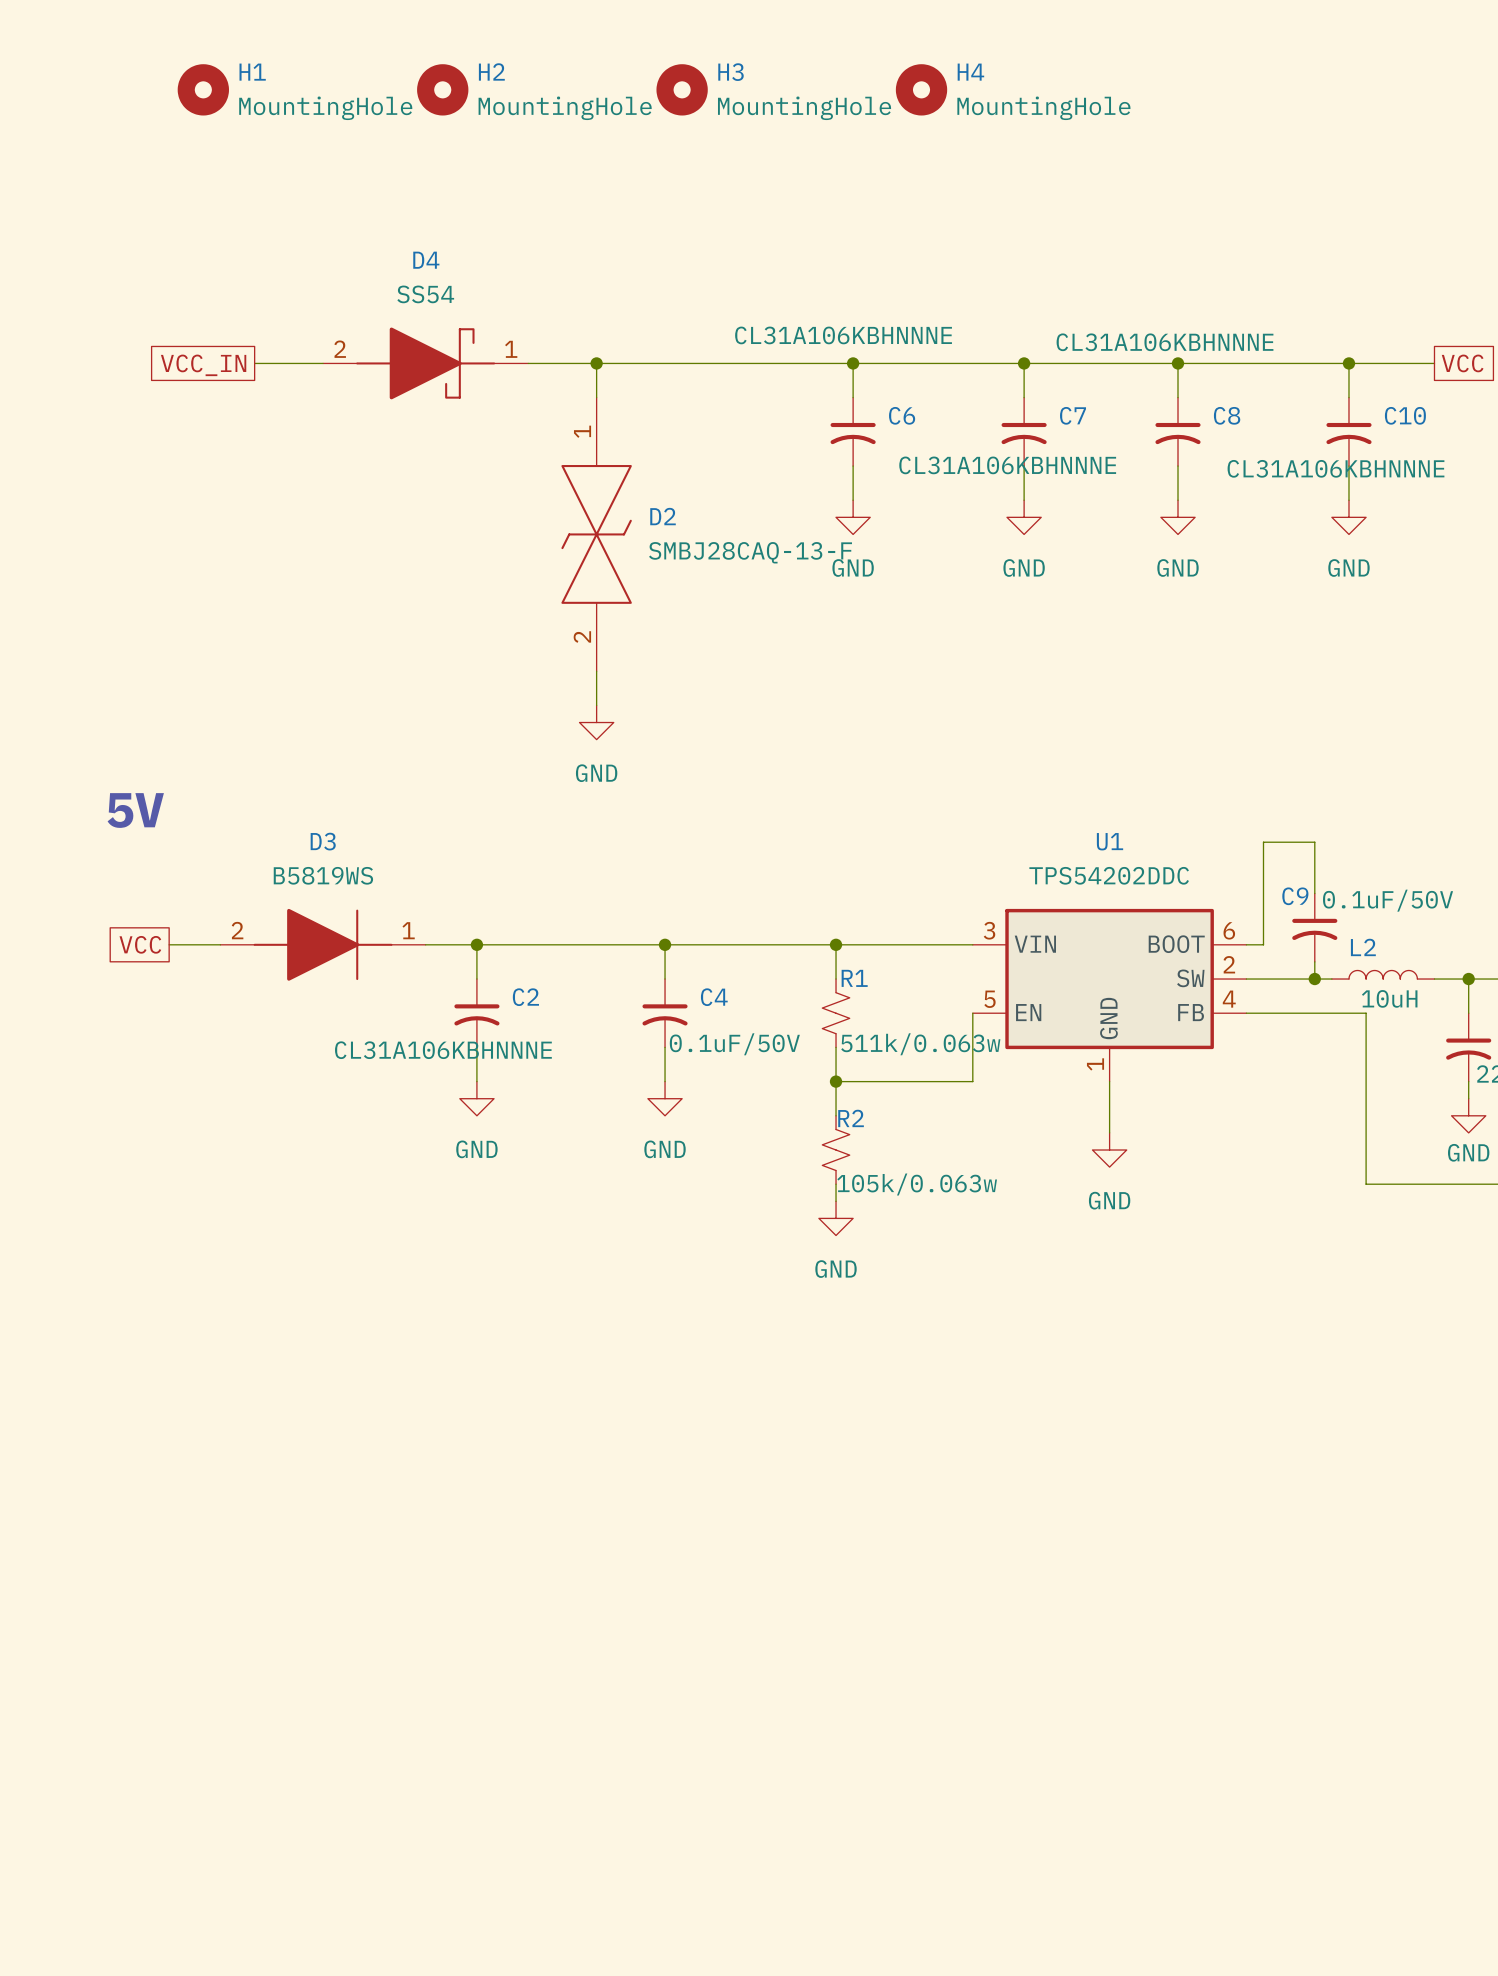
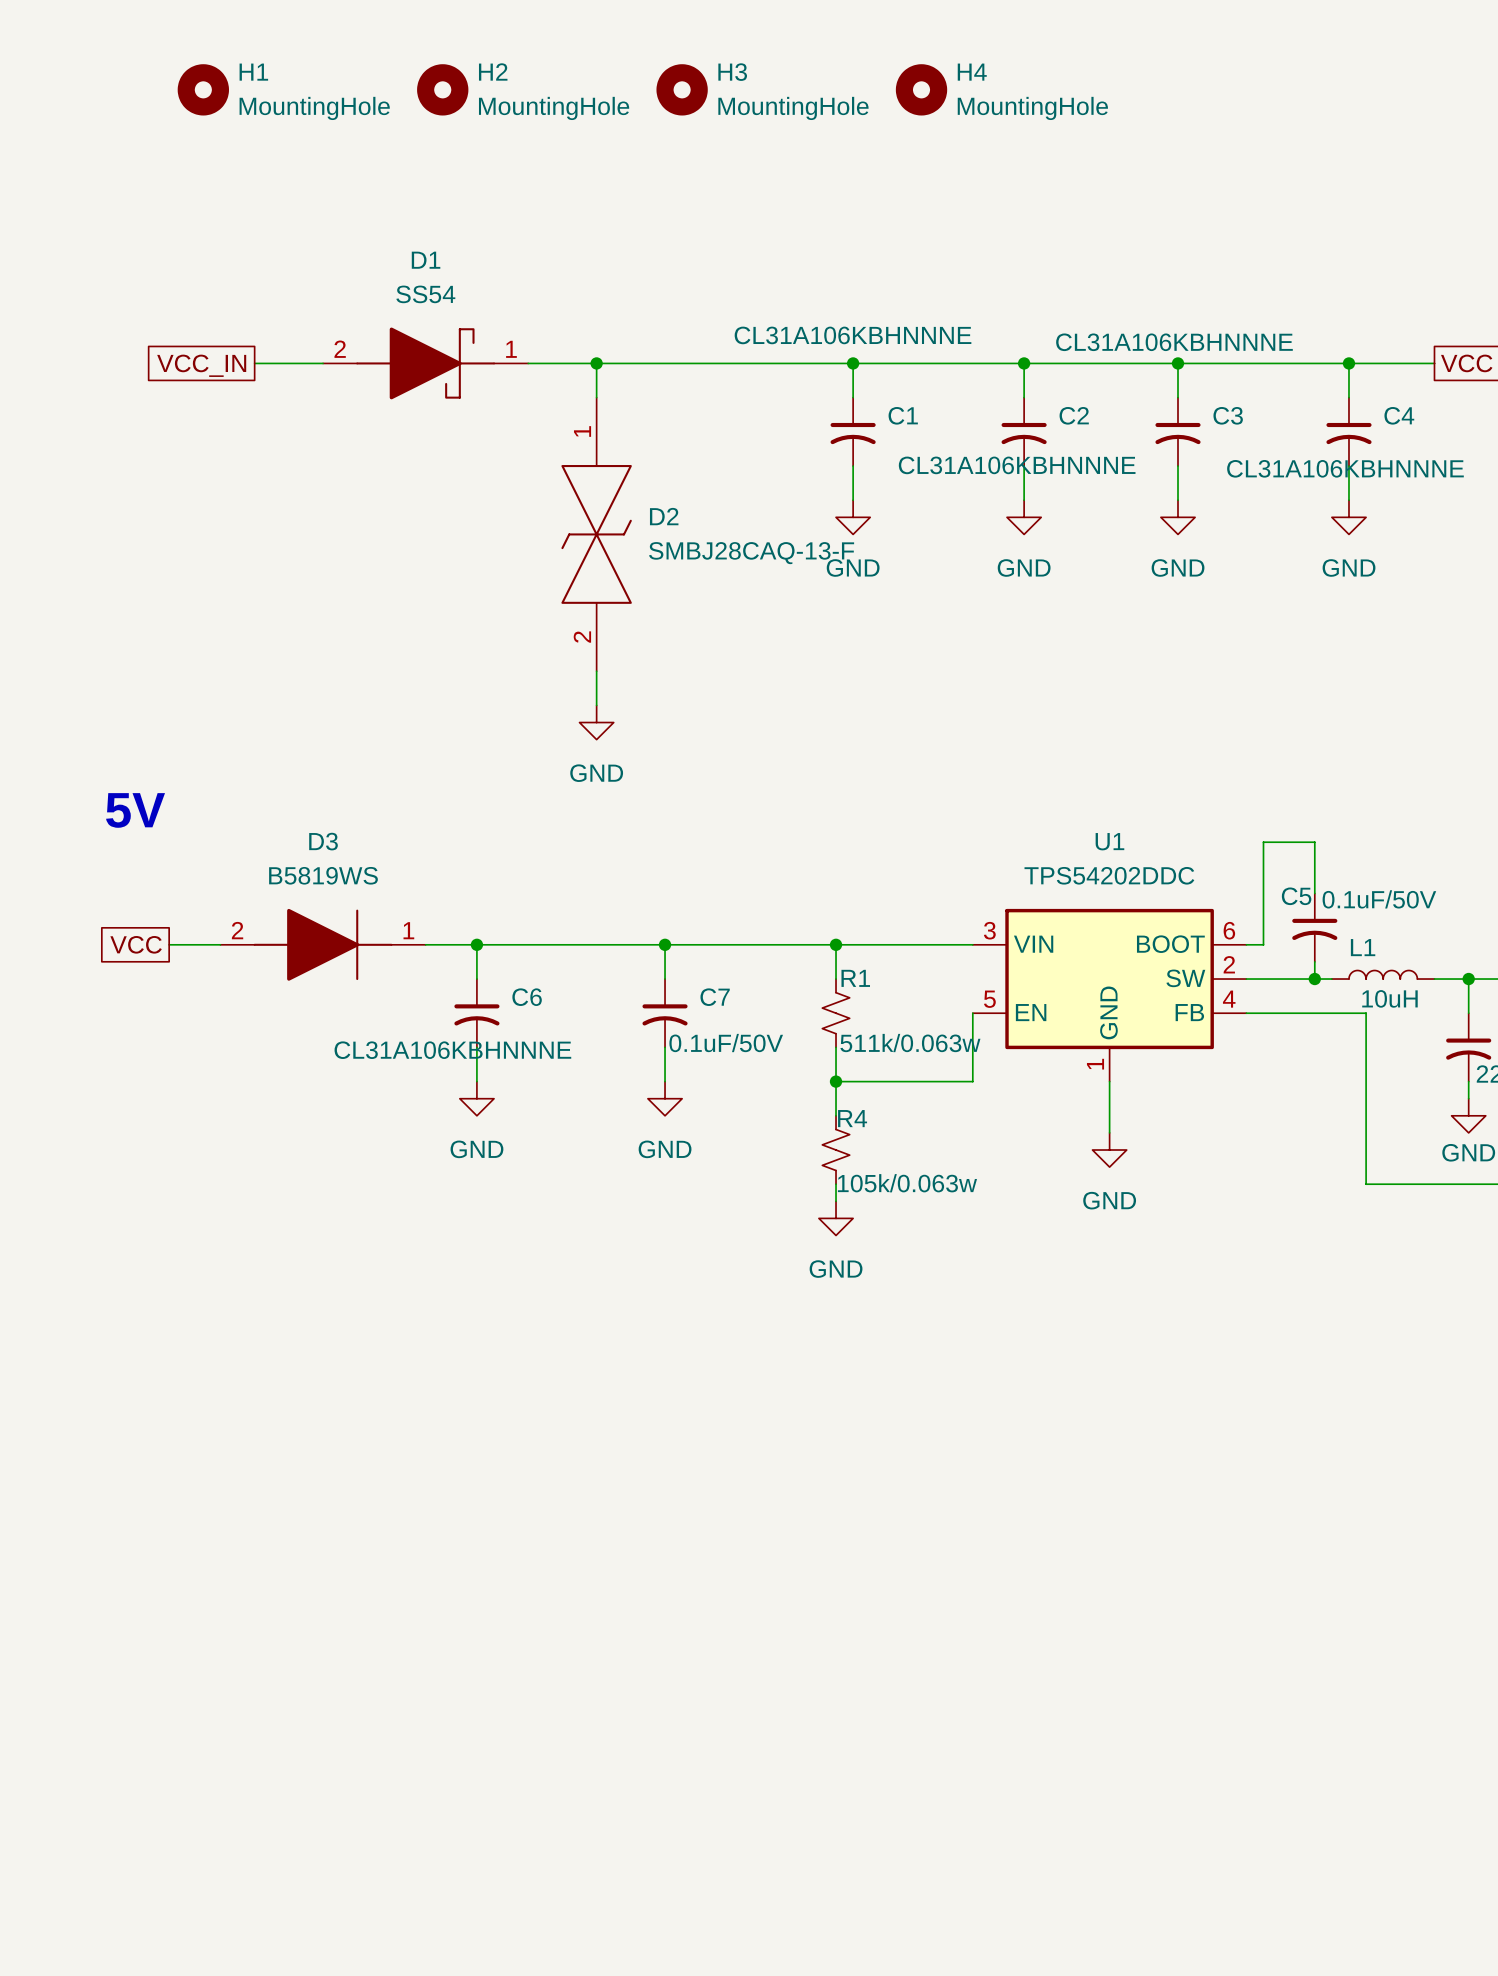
D4 name: D4 (426, 260) -> D1 (426, 260)
C6 name: C6 (902, 415) -> C1 (903, 415)
C7 name: C7 (1073, 415) -> C2 (1074, 415)
C8 name: C8 (1227, 415) -> C3 (1228, 415)
C10 name: C10 (1405, 415) -> C4 (1399, 415)
C9 name: C9 (1295, 896) -> C5 (1296, 896)
L2 name: L2 (1363, 947) -> L1 (1363, 947)
C2 name: C2 (525, 997) -> C6 (527, 997)
C4 name: C4 (714, 997) -> C7 (715, 997)
R2 name: R2 (851, 1118) -> R4 (852, 1118)

